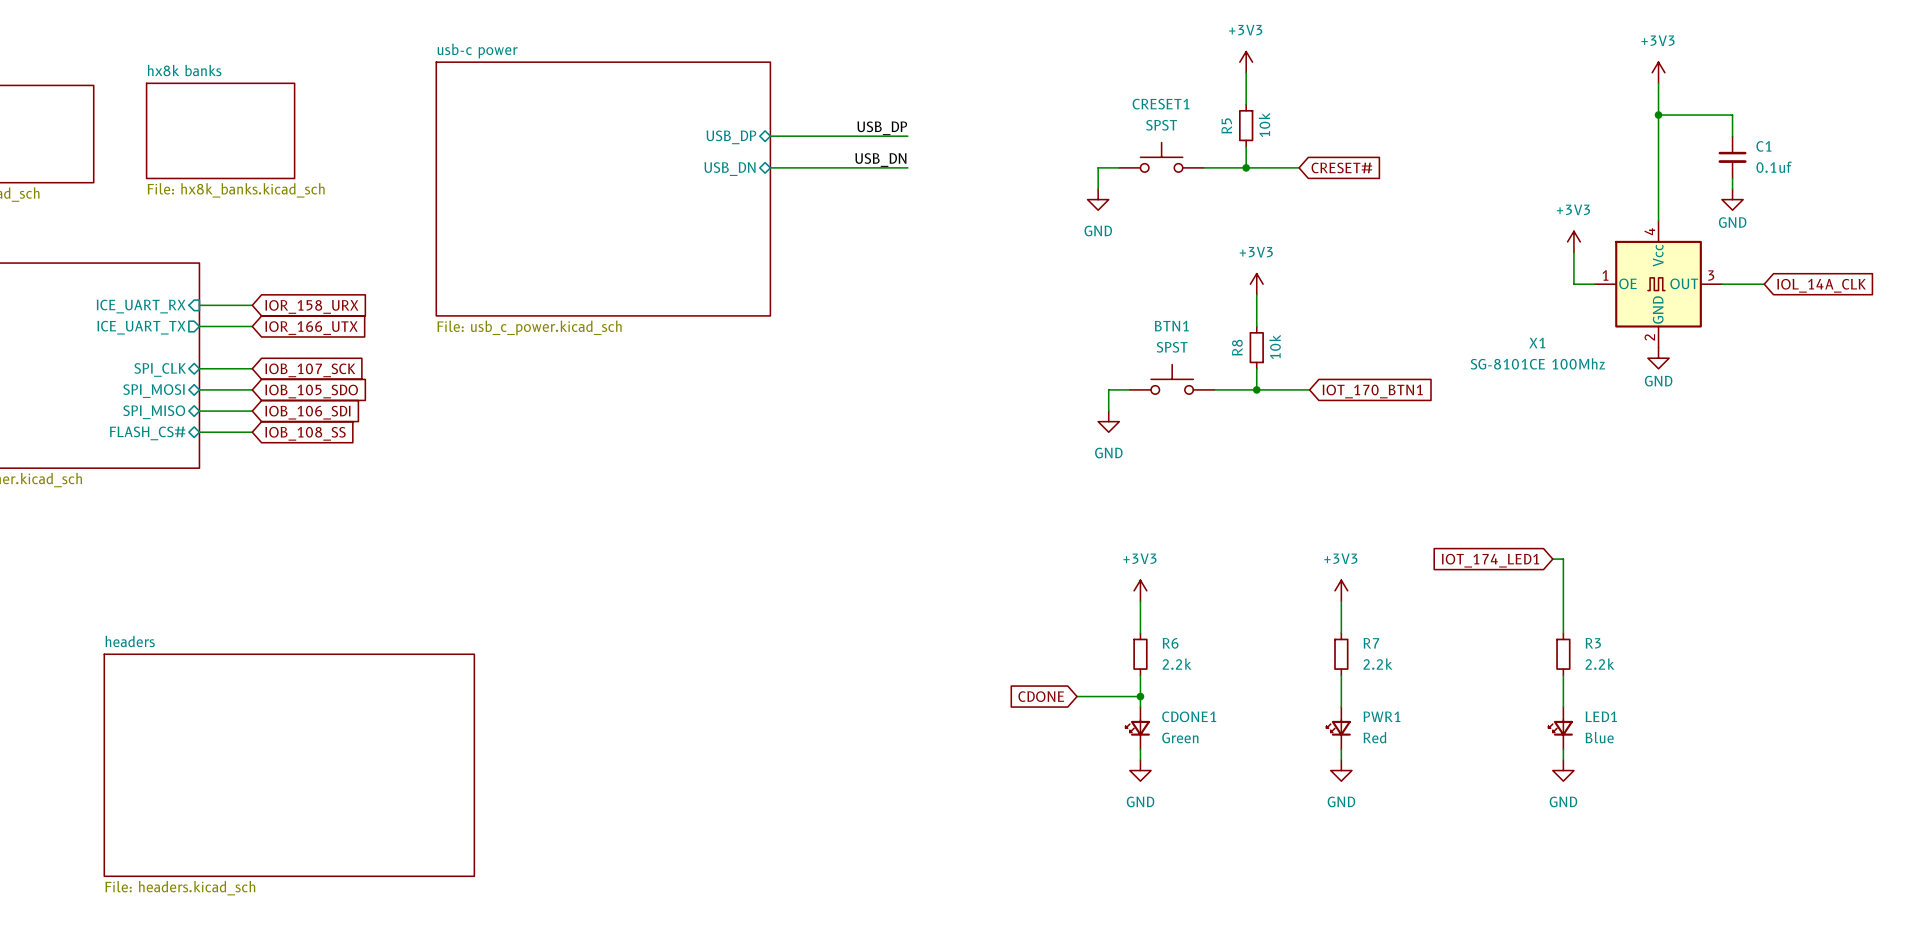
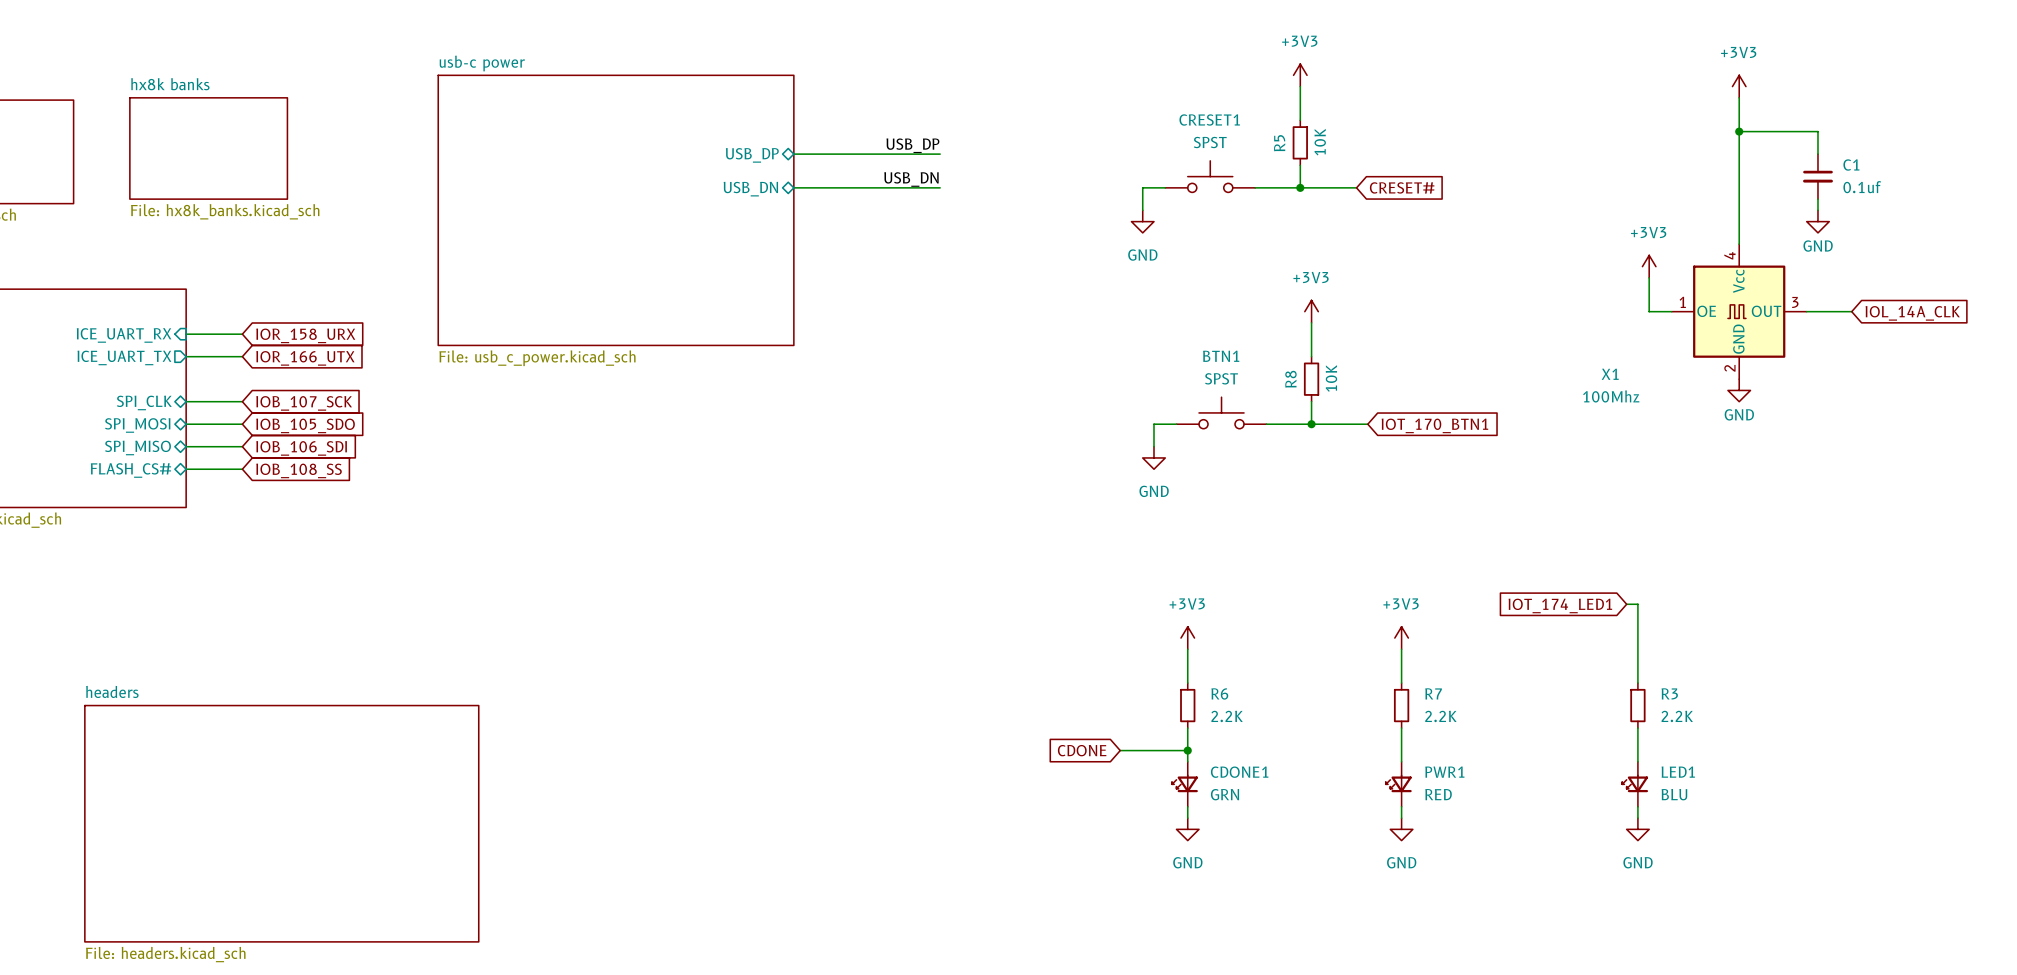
R5 value: 10k (1264, 124) -> 10K (1320, 142)
R8 value: 10k (1275, 346) -> 10K (1331, 378)
X1 value: SG-8101CE 100Mhz (1537, 363) -> 100Mhz (1611, 396)
R6 value: 2.2k (1177, 664) -> 2.2K (1227, 716)
R7 value: 2.2k (1377, 664) -> 2.2K (1440, 716)
R3 value: 2.2k (1600, 664) -> 2.2K (1677, 716)
CDONE1 value: Green (1180, 737) -> GRN (1225, 794)
PWR1 value: Red (1374, 737) -> RED (1438, 794)
LED1 value: Blue (1599, 737) -> BLU (1674, 794)

